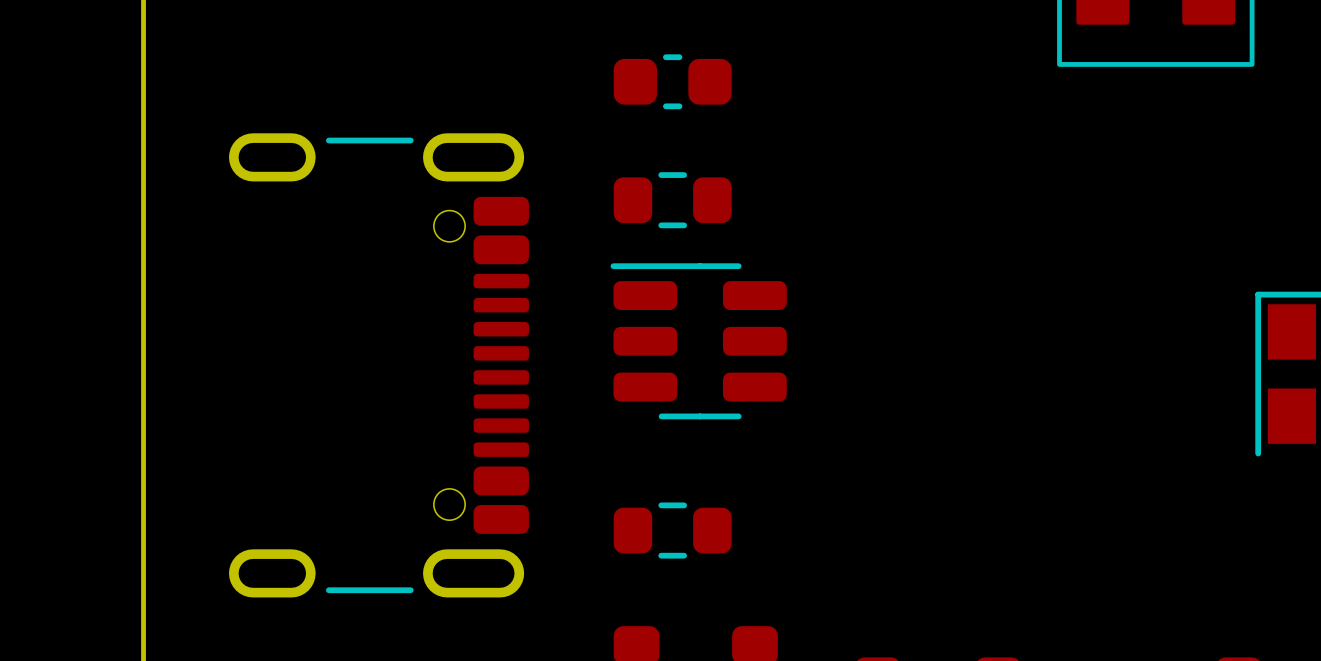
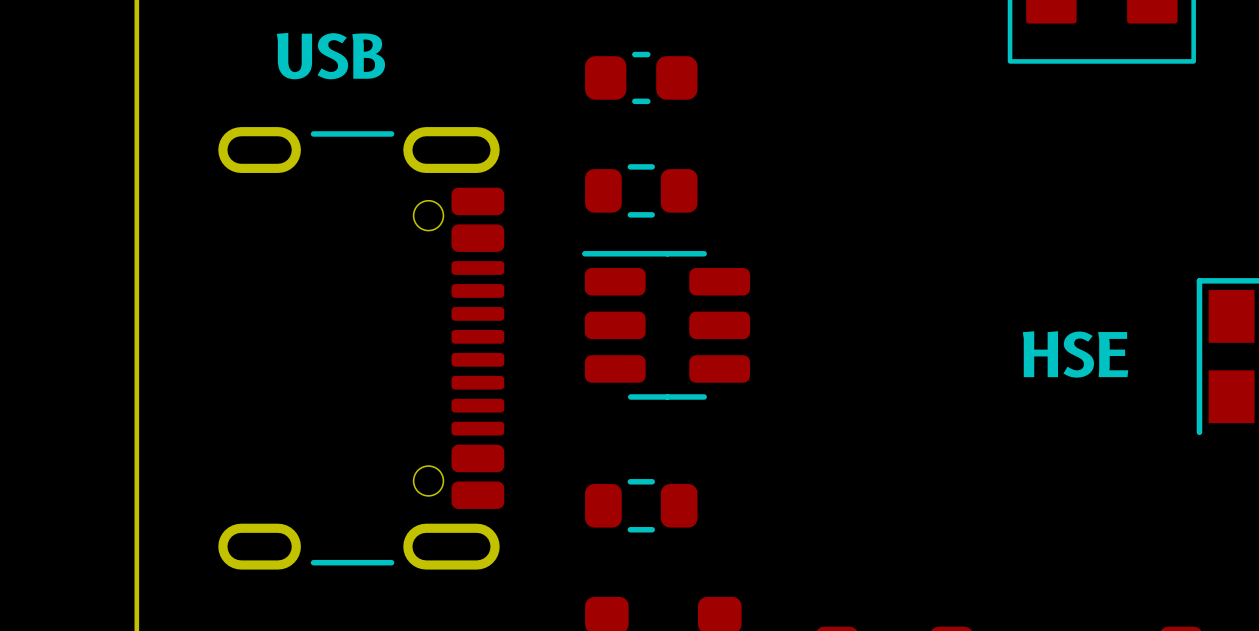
text: none -> USB (330, 56)
text: none -> HSE (1075, 354)

